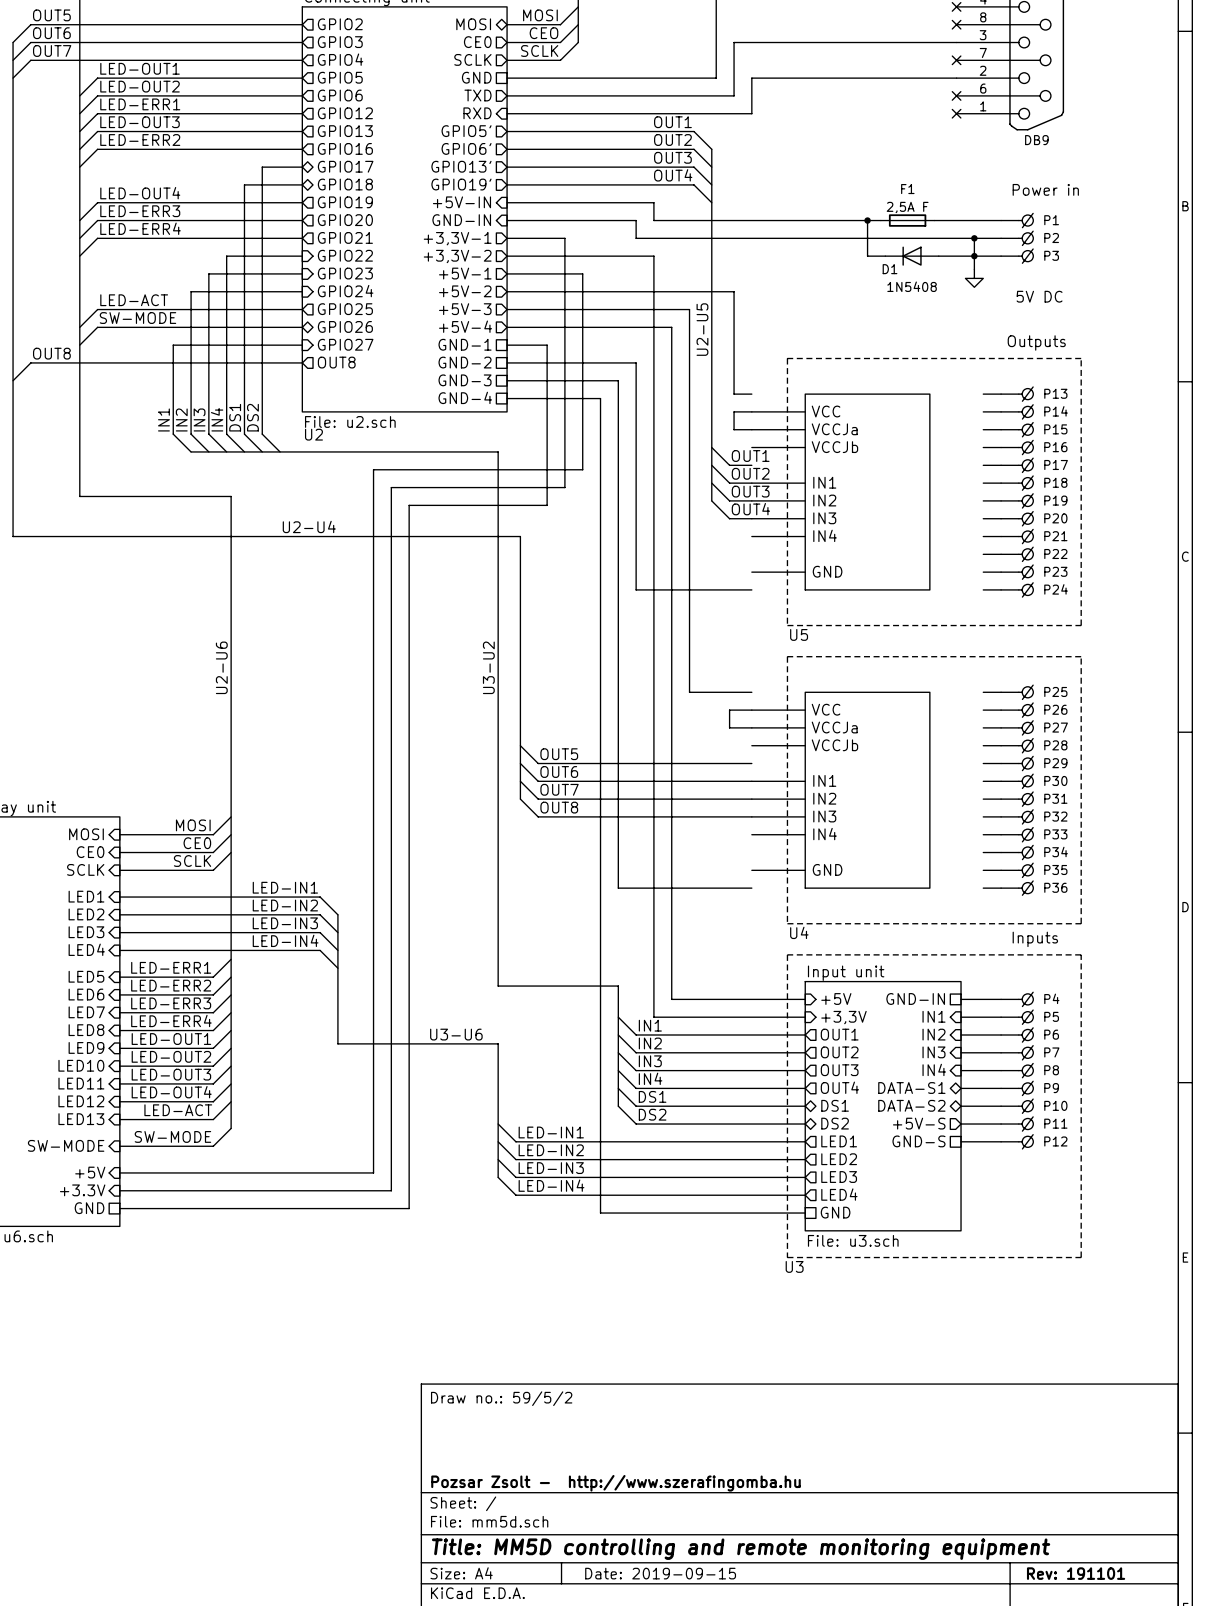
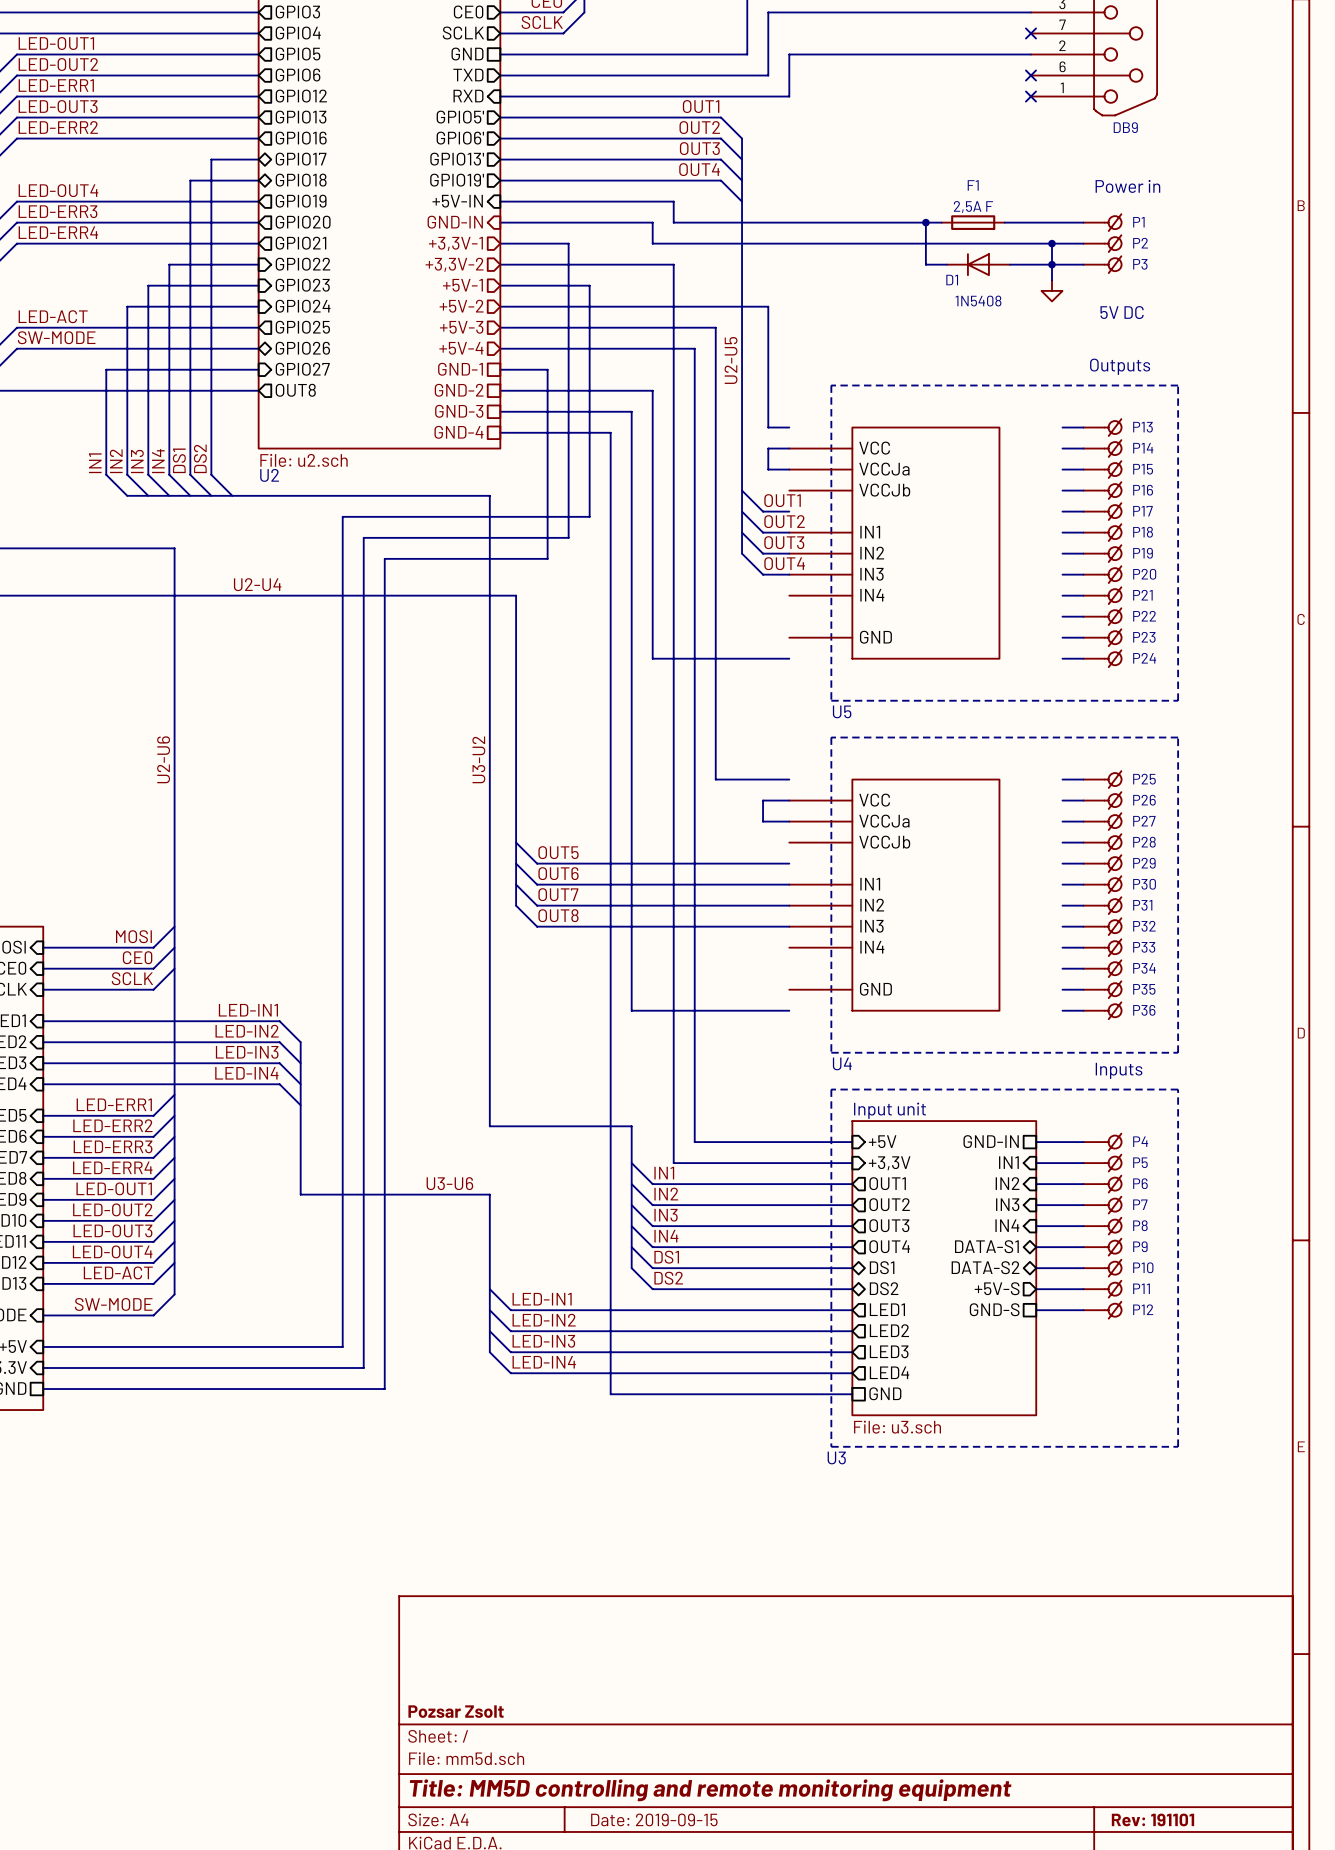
title block: Draw no.: 59/5/2 (501, 1398) -> none
title block: Pozsar Zsolt - http://www.szerafingomba.hu (615, 1483) -> Pozsar Zsolt (456, 1711)

